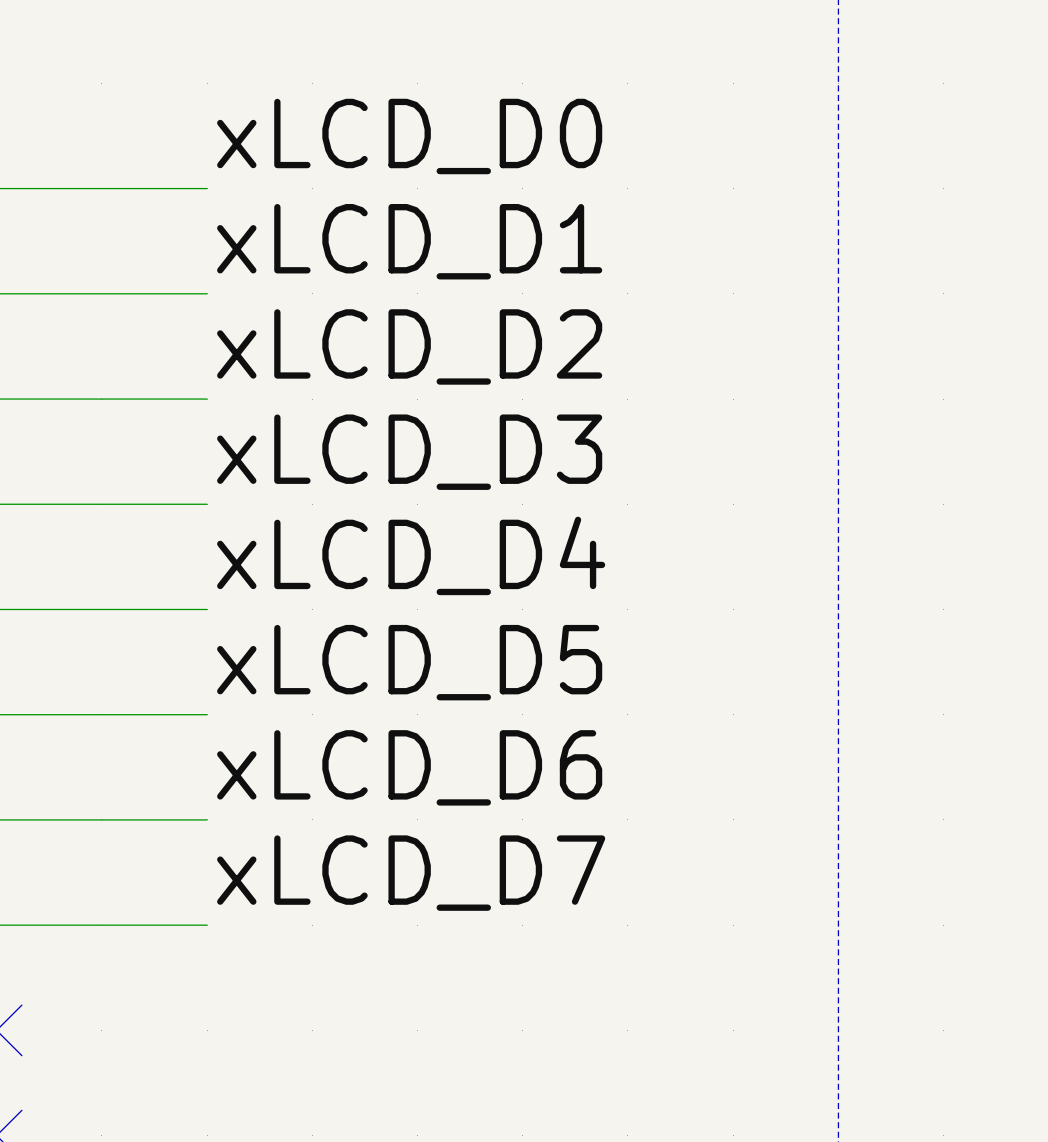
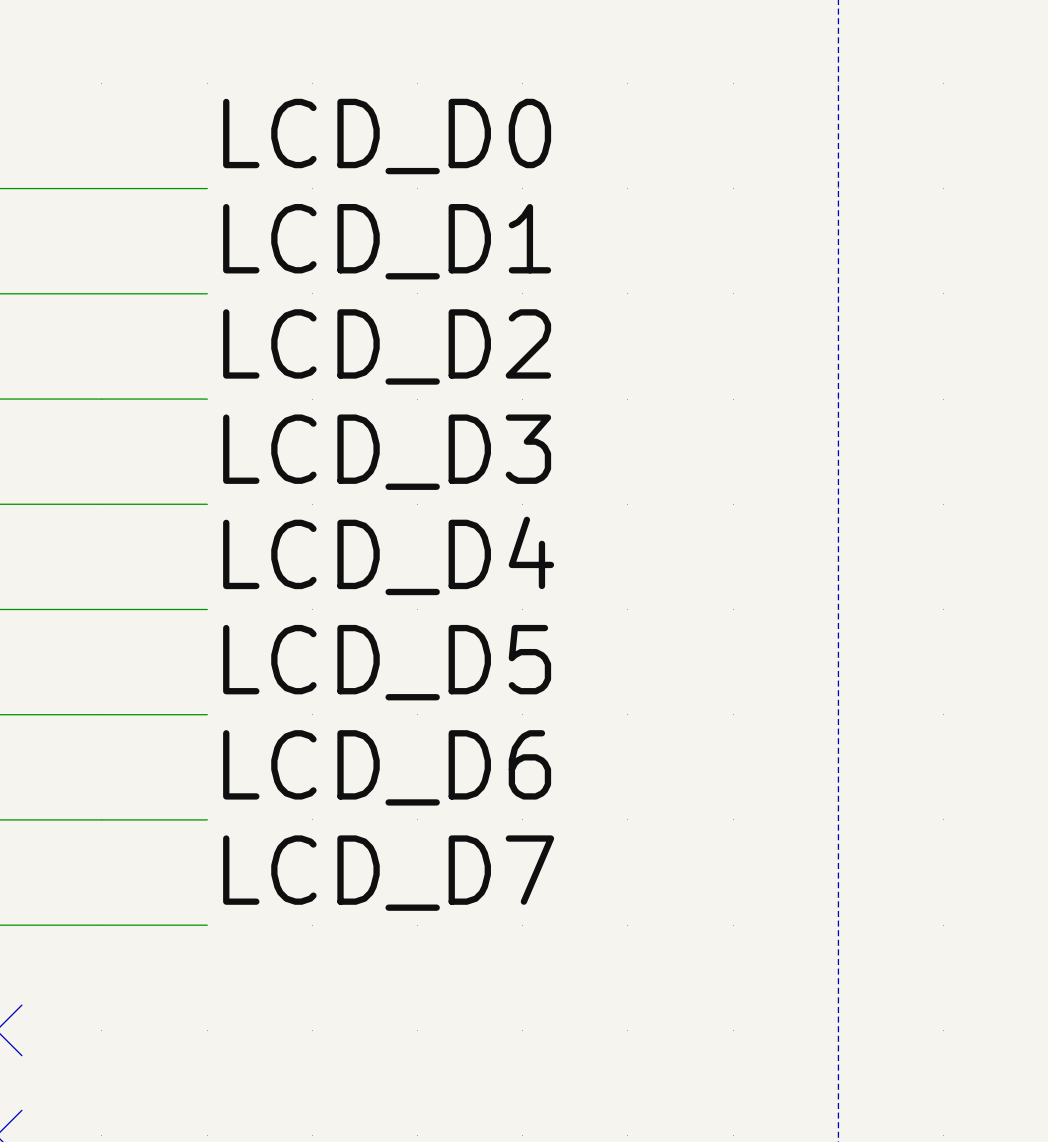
label: xLCD_D0 (409, 136) -> LCD_D0 (387, 136)
label: xLCD_D1 (409, 241) -> LCD_D1 (387, 241)
label: xLCD_D2 (409, 346) -> LCD_D2 (387, 346)
label: xLCD_D3 (409, 452) -> LCD_D3 (387, 452)
label: xLCD_D4 (411, 555) -> LCD_D4 (388, 555)
label: xLCD_D5 (409, 662) -> LCD_D5 (387, 662)
label: xLCD_D6 (409, 767) -> LCD_D6 (387, 767)
label: xLCD_D7 (411, 873) -> LCD_D7 (388, 873)

